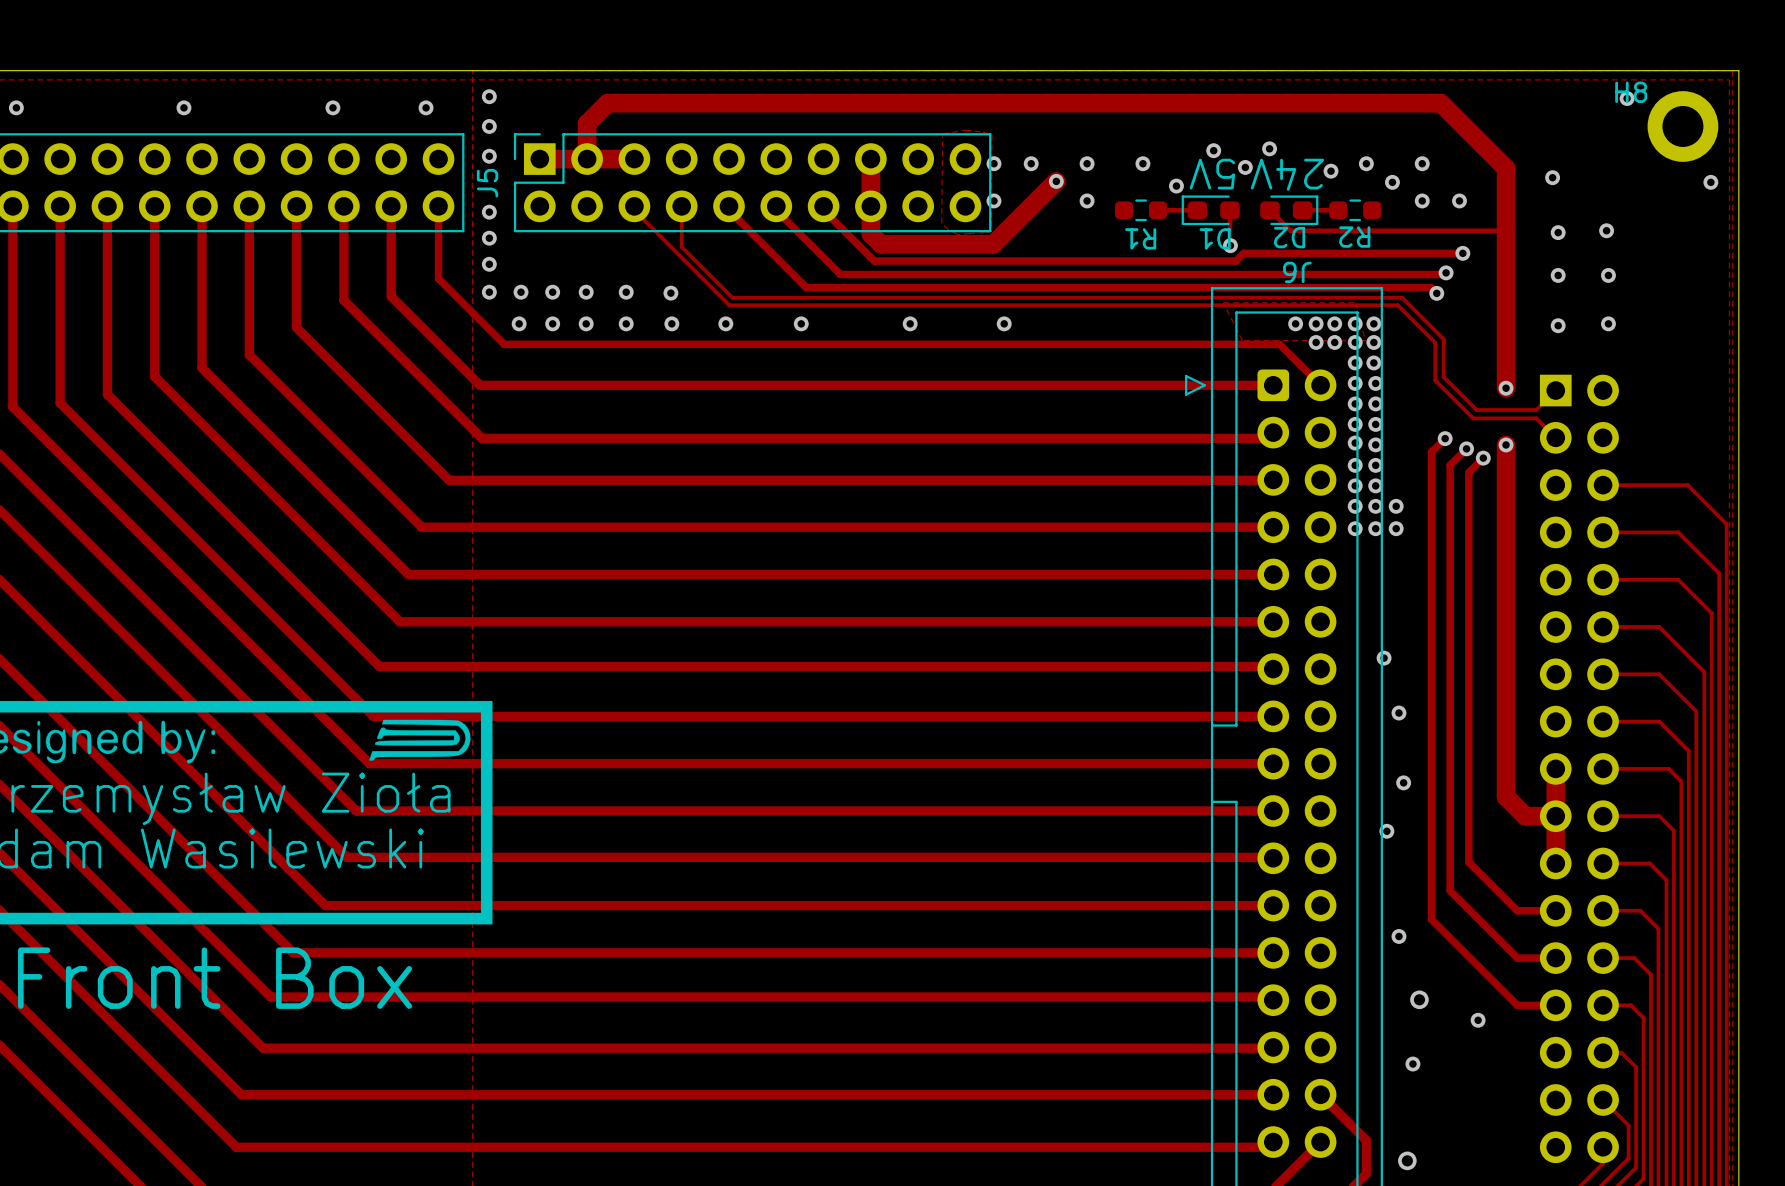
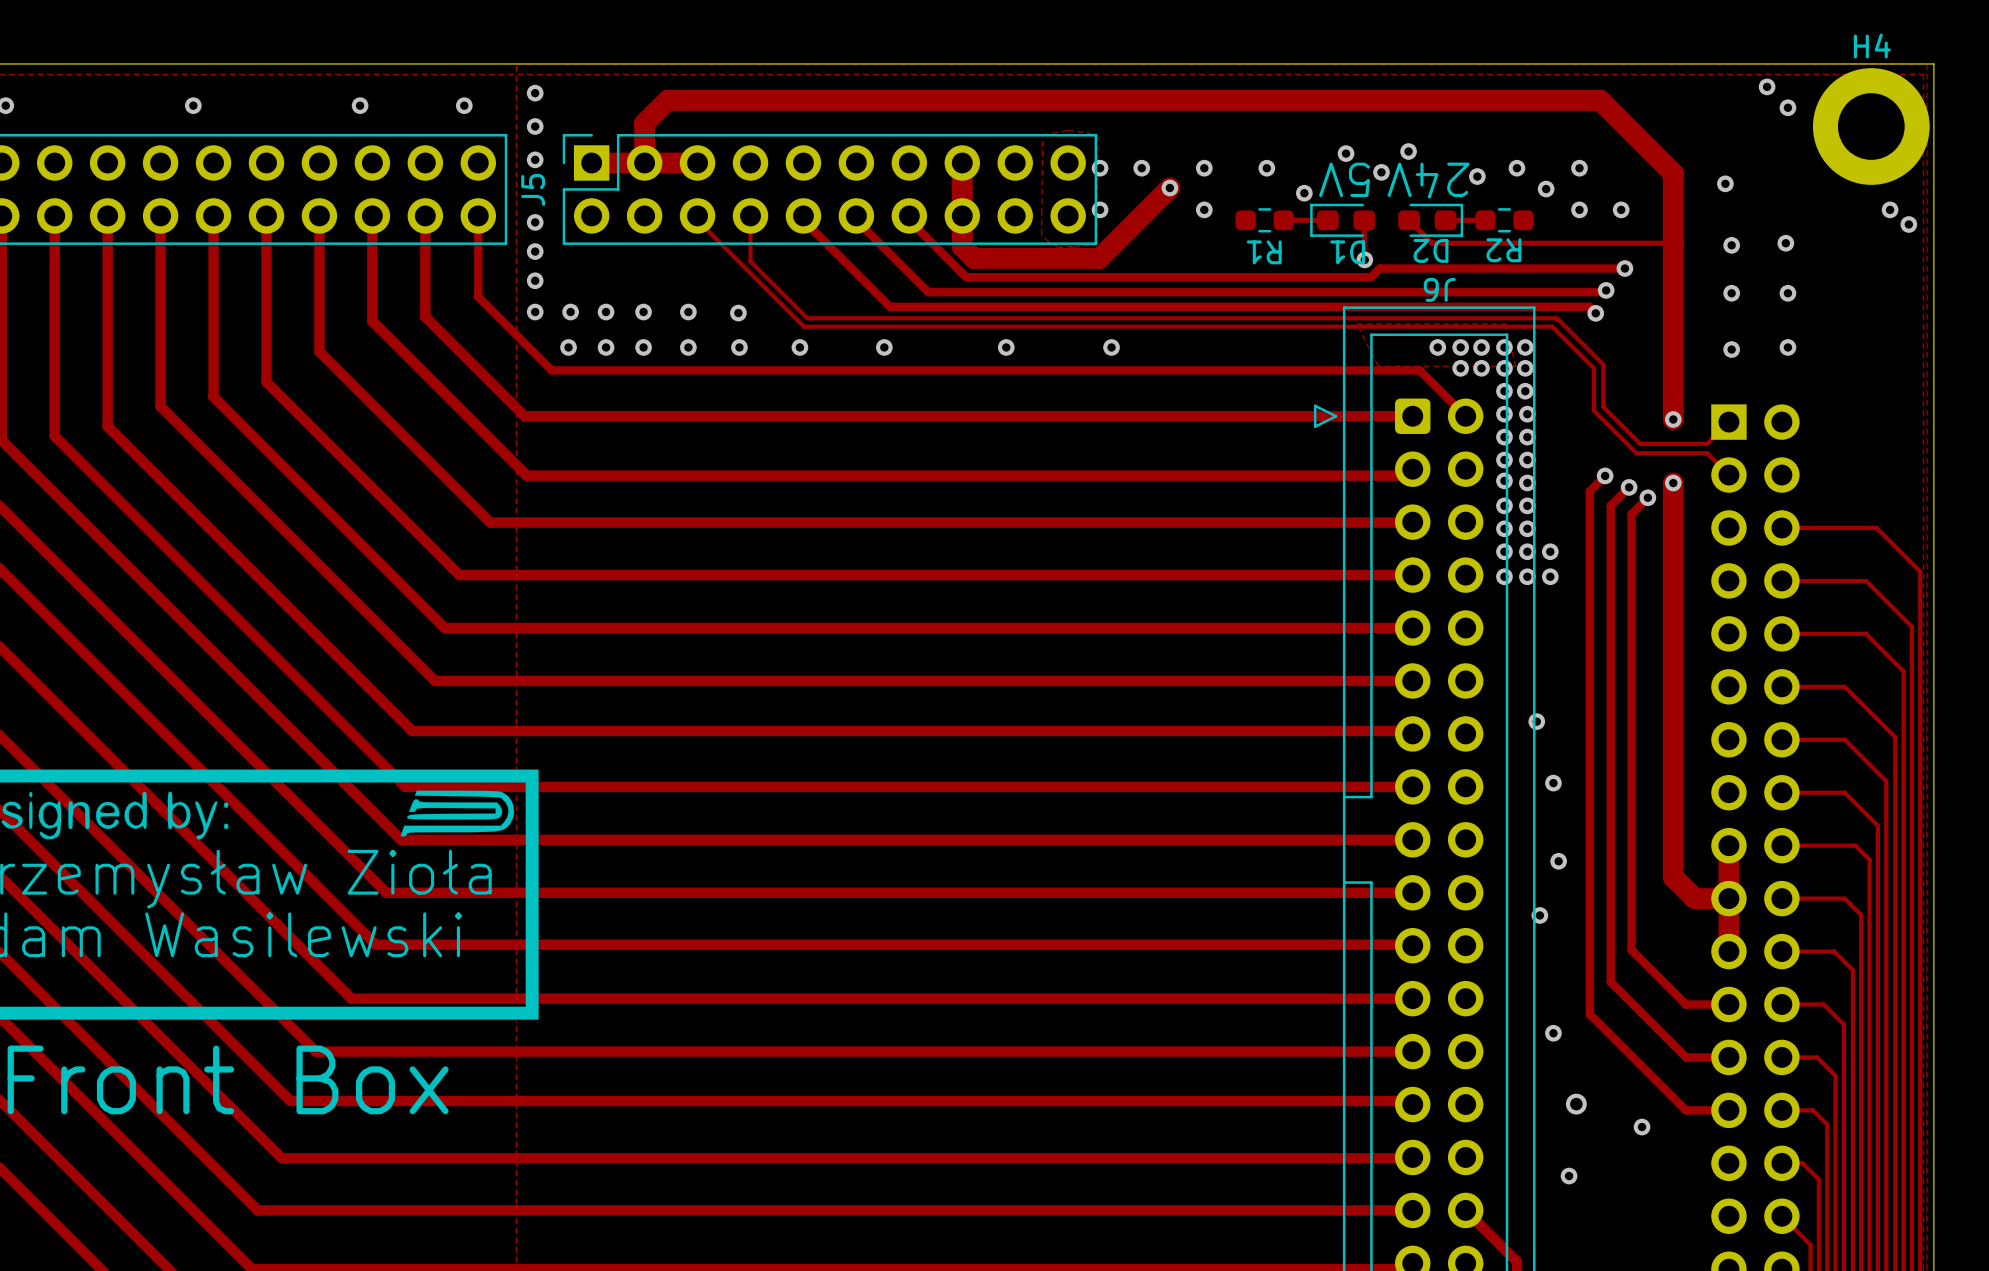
via: none -> (1767, 86)
via: (1627, 98) -> none
via: none -> (1787, 107)
H8: (1682, 126) -> none
H4: none -> (1871, 126)
via: (1710, 182) -> none
via: none -> (1890, 209)
via: none -> (1908, 224)

